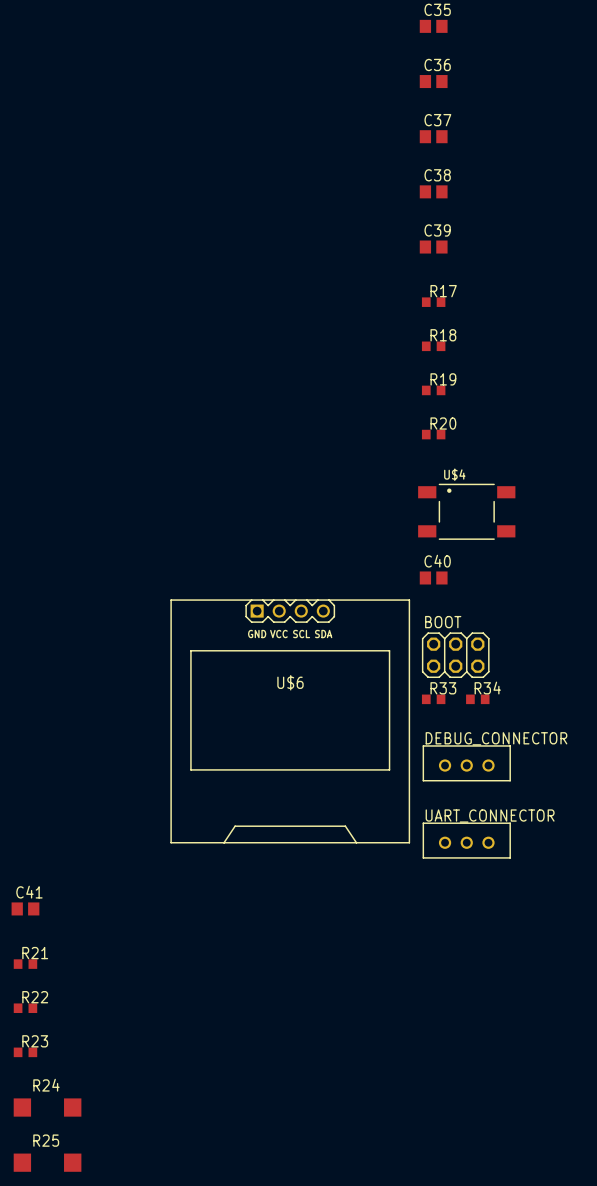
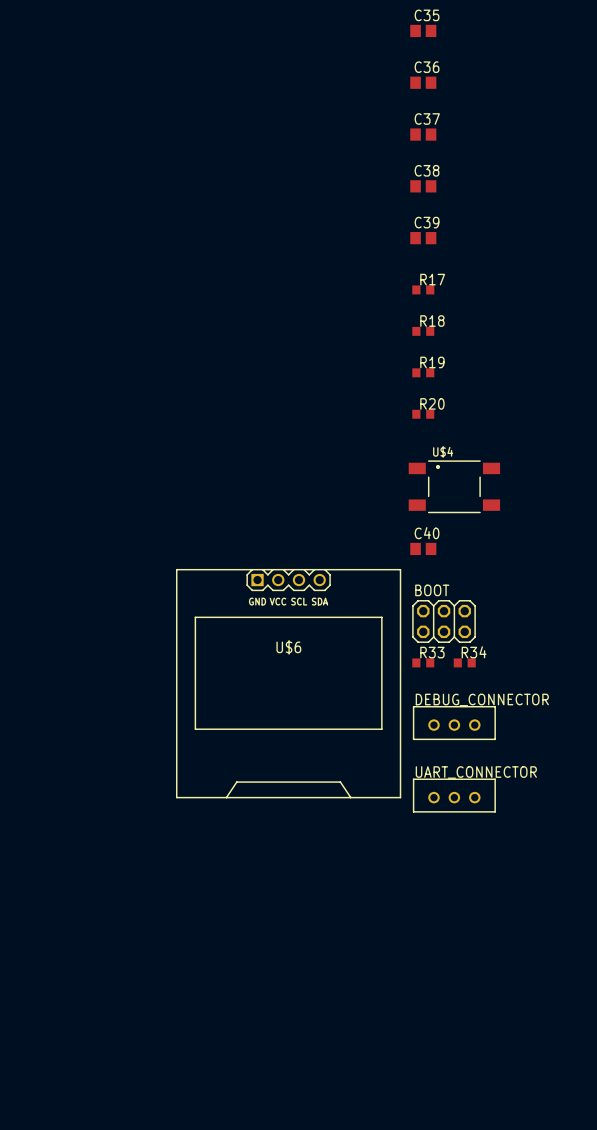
C41: (25, 908) -> none
R21: (25, 964) -> none
R22: (25, 1008) -> none
R23: (25, 1052) -> none
R24: (47, 1107) -> none
R25: (47, 1162) -> none

